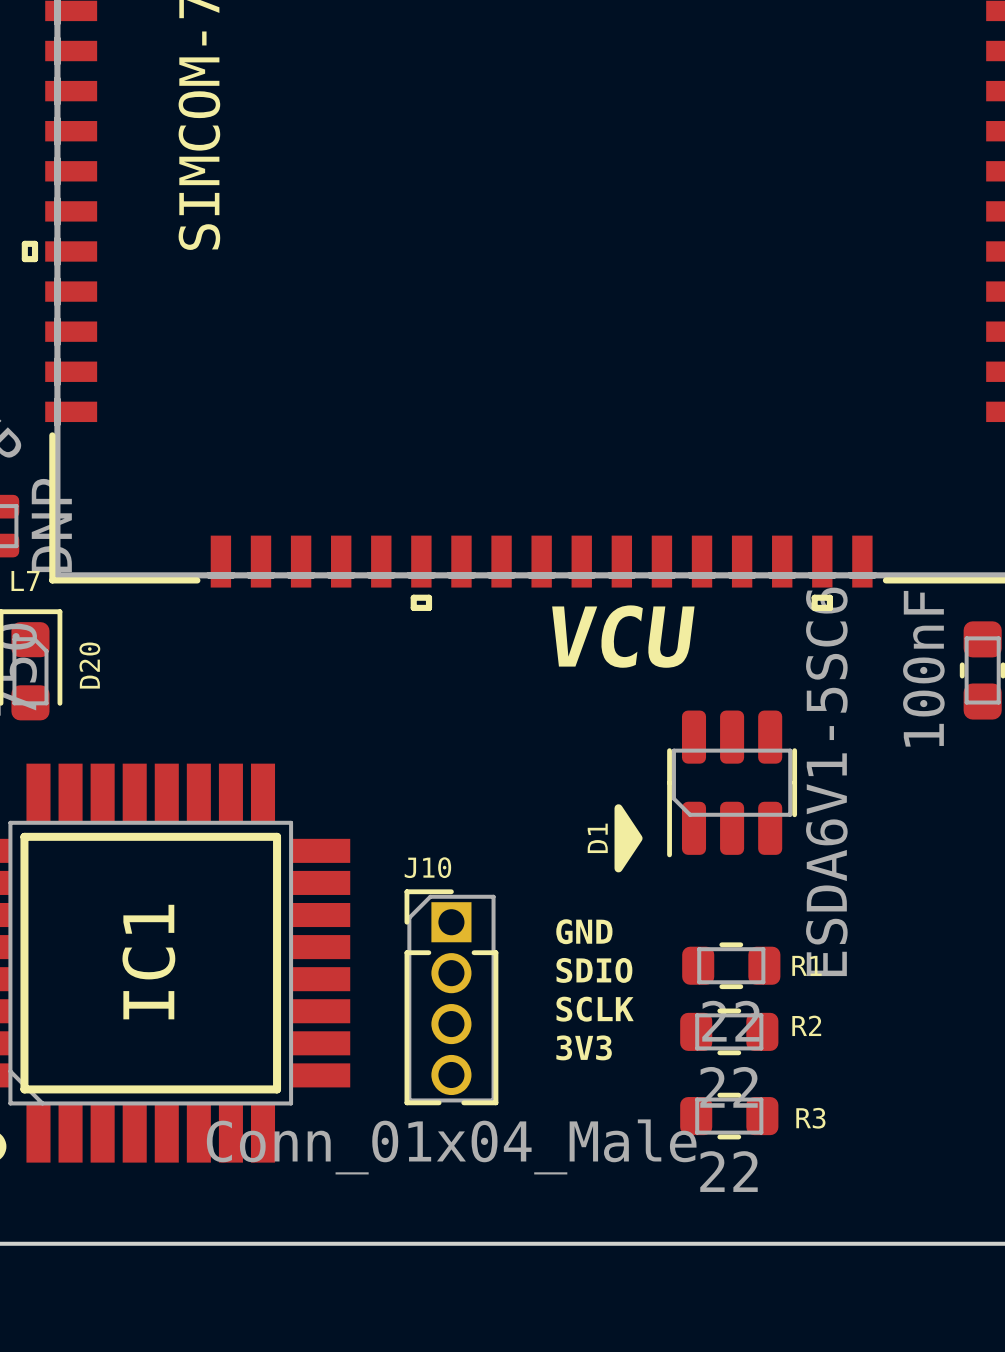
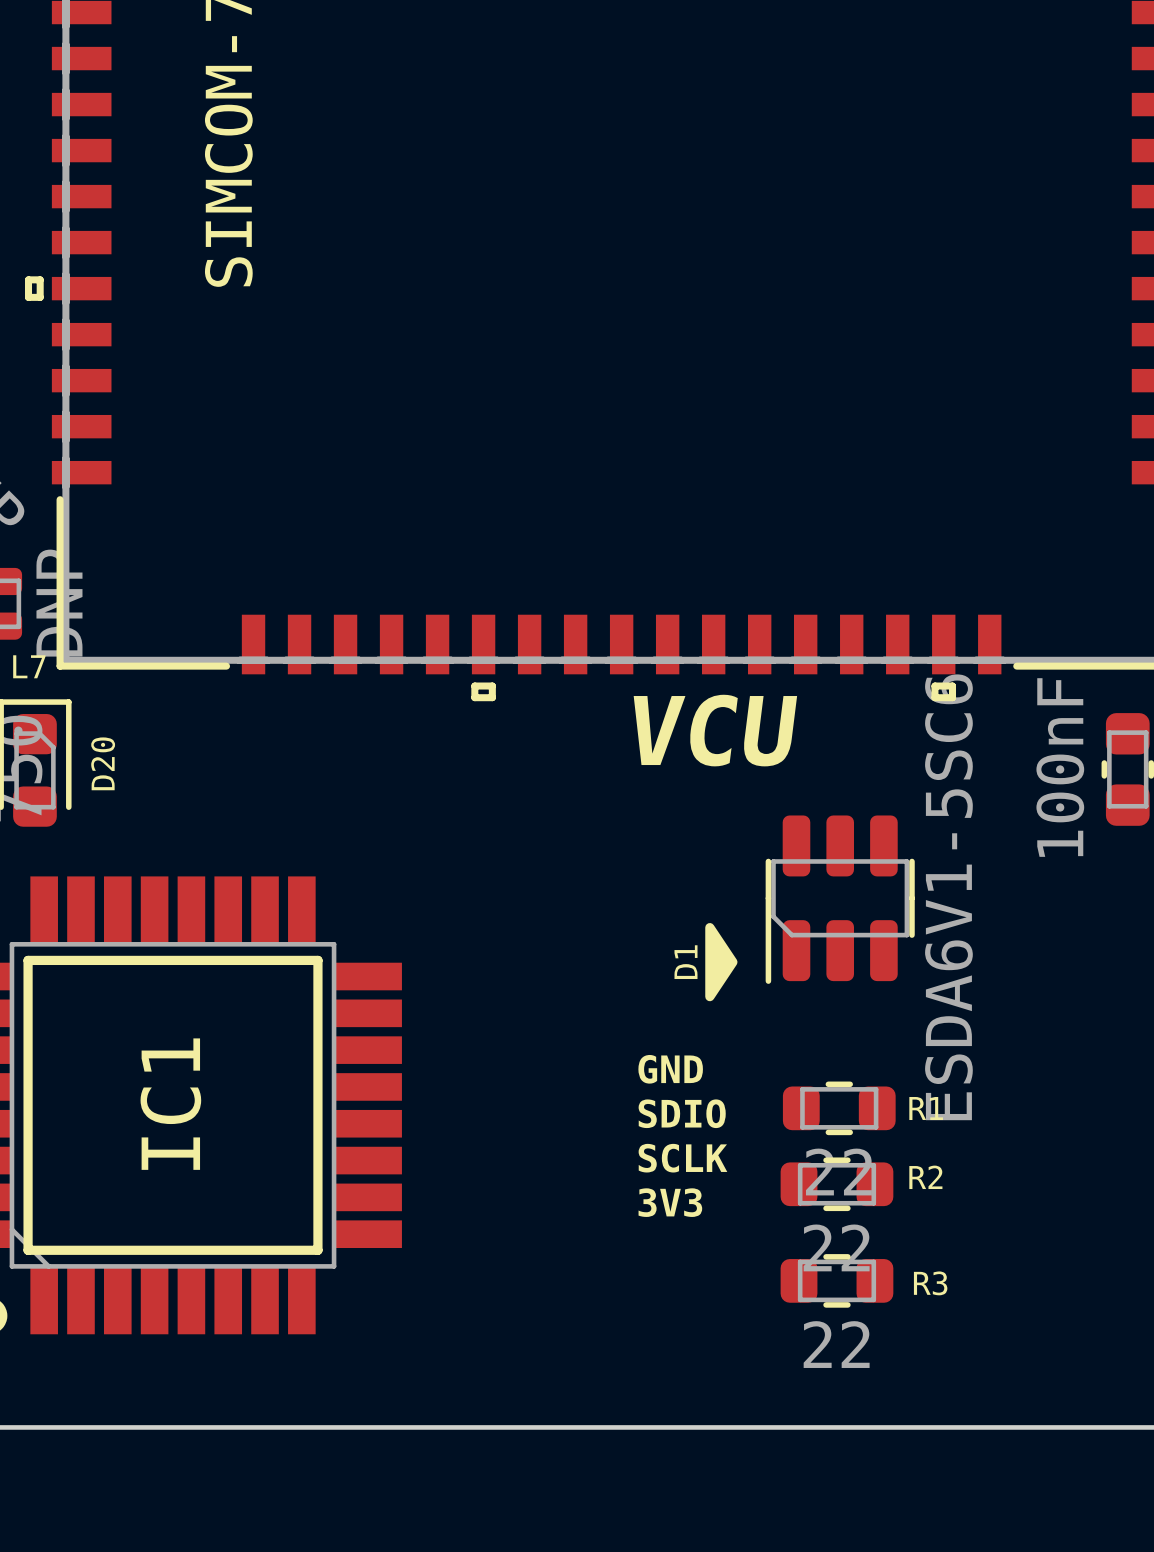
J10: Conn_01x04_Male (451, 997) -> none

